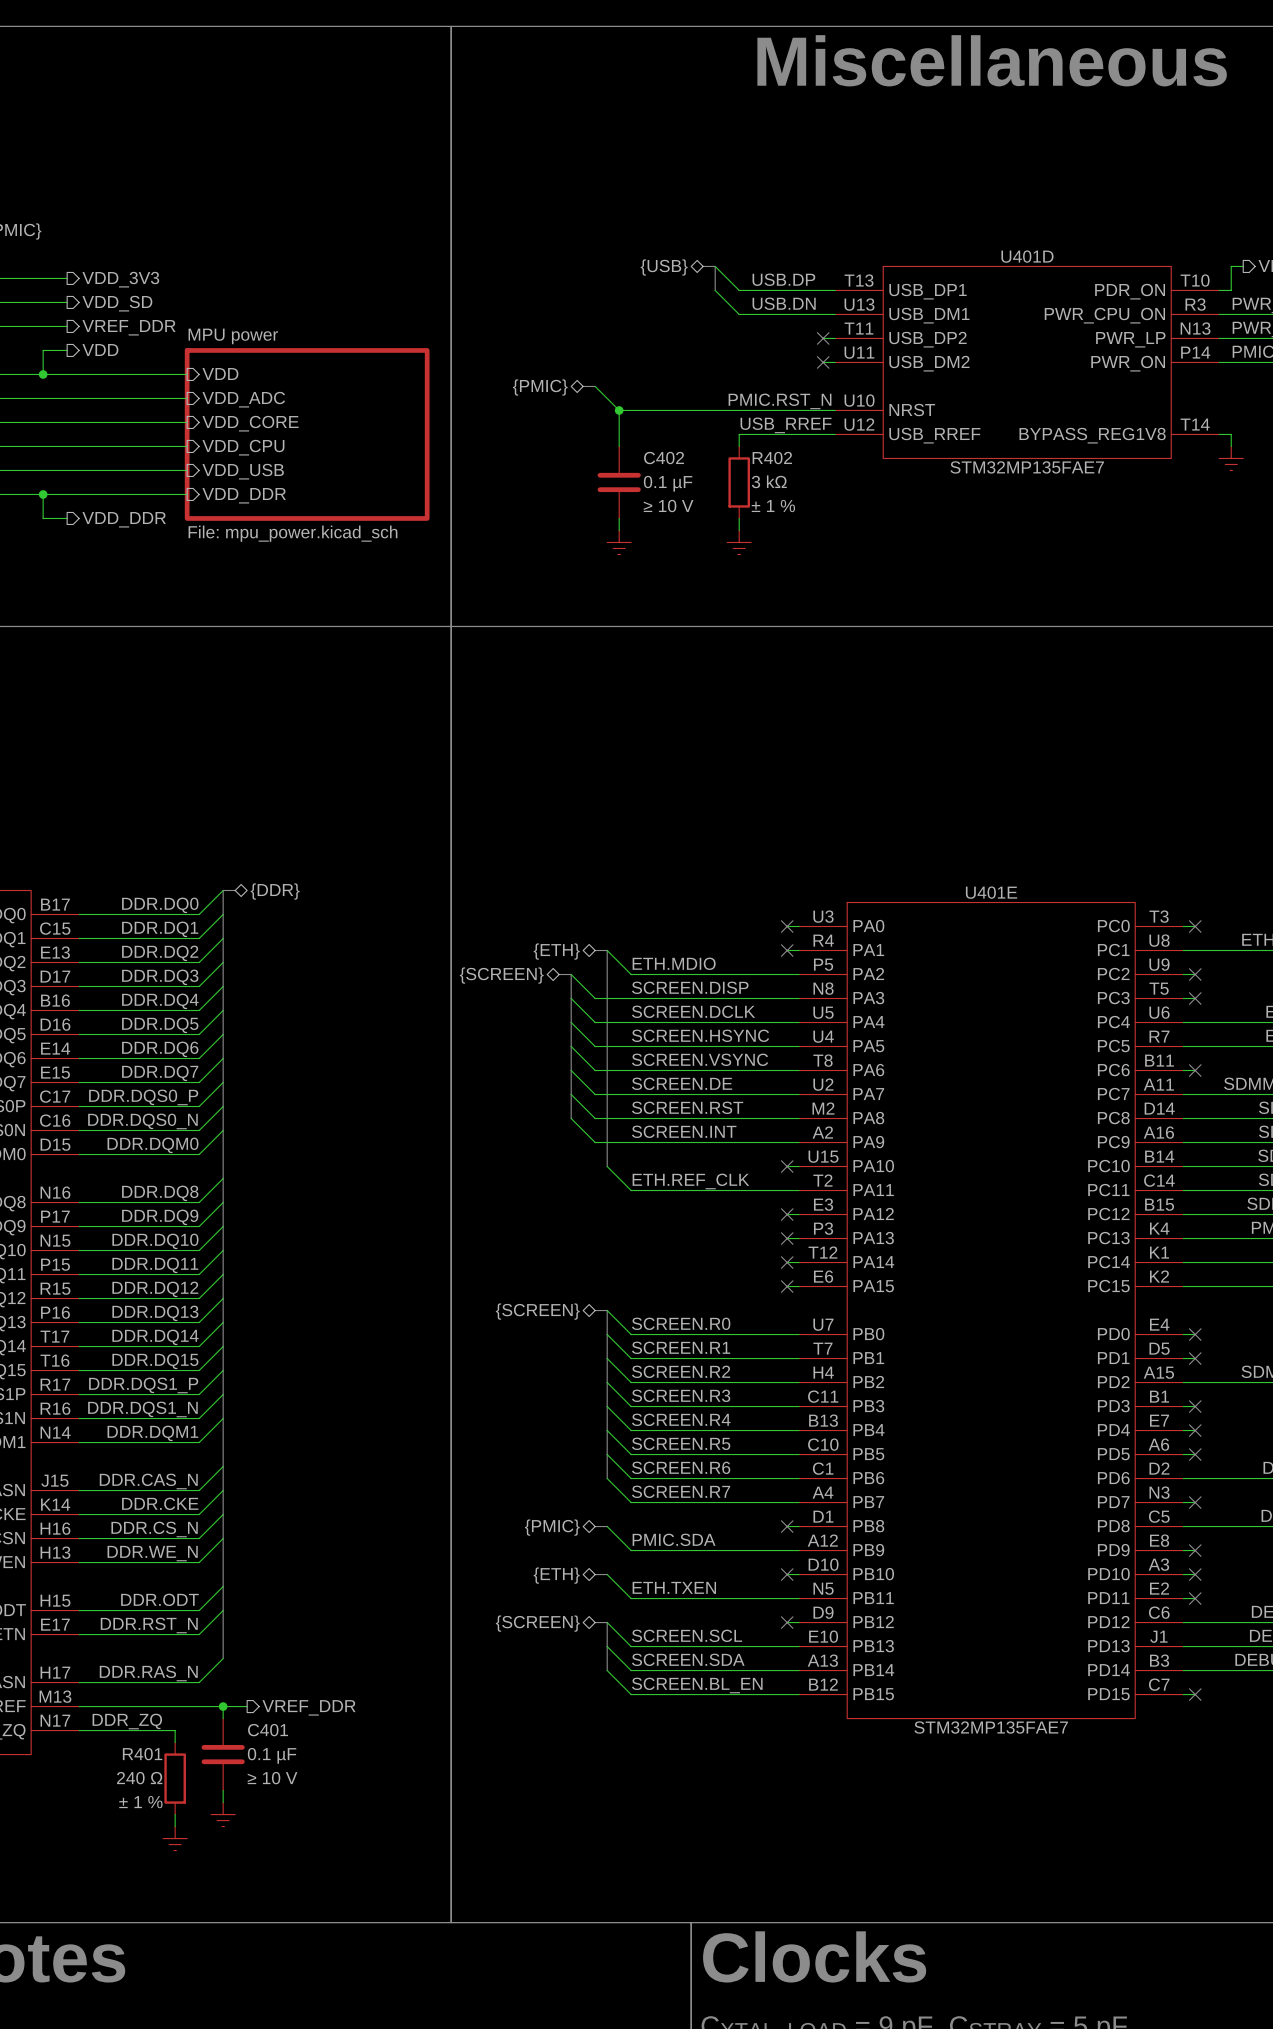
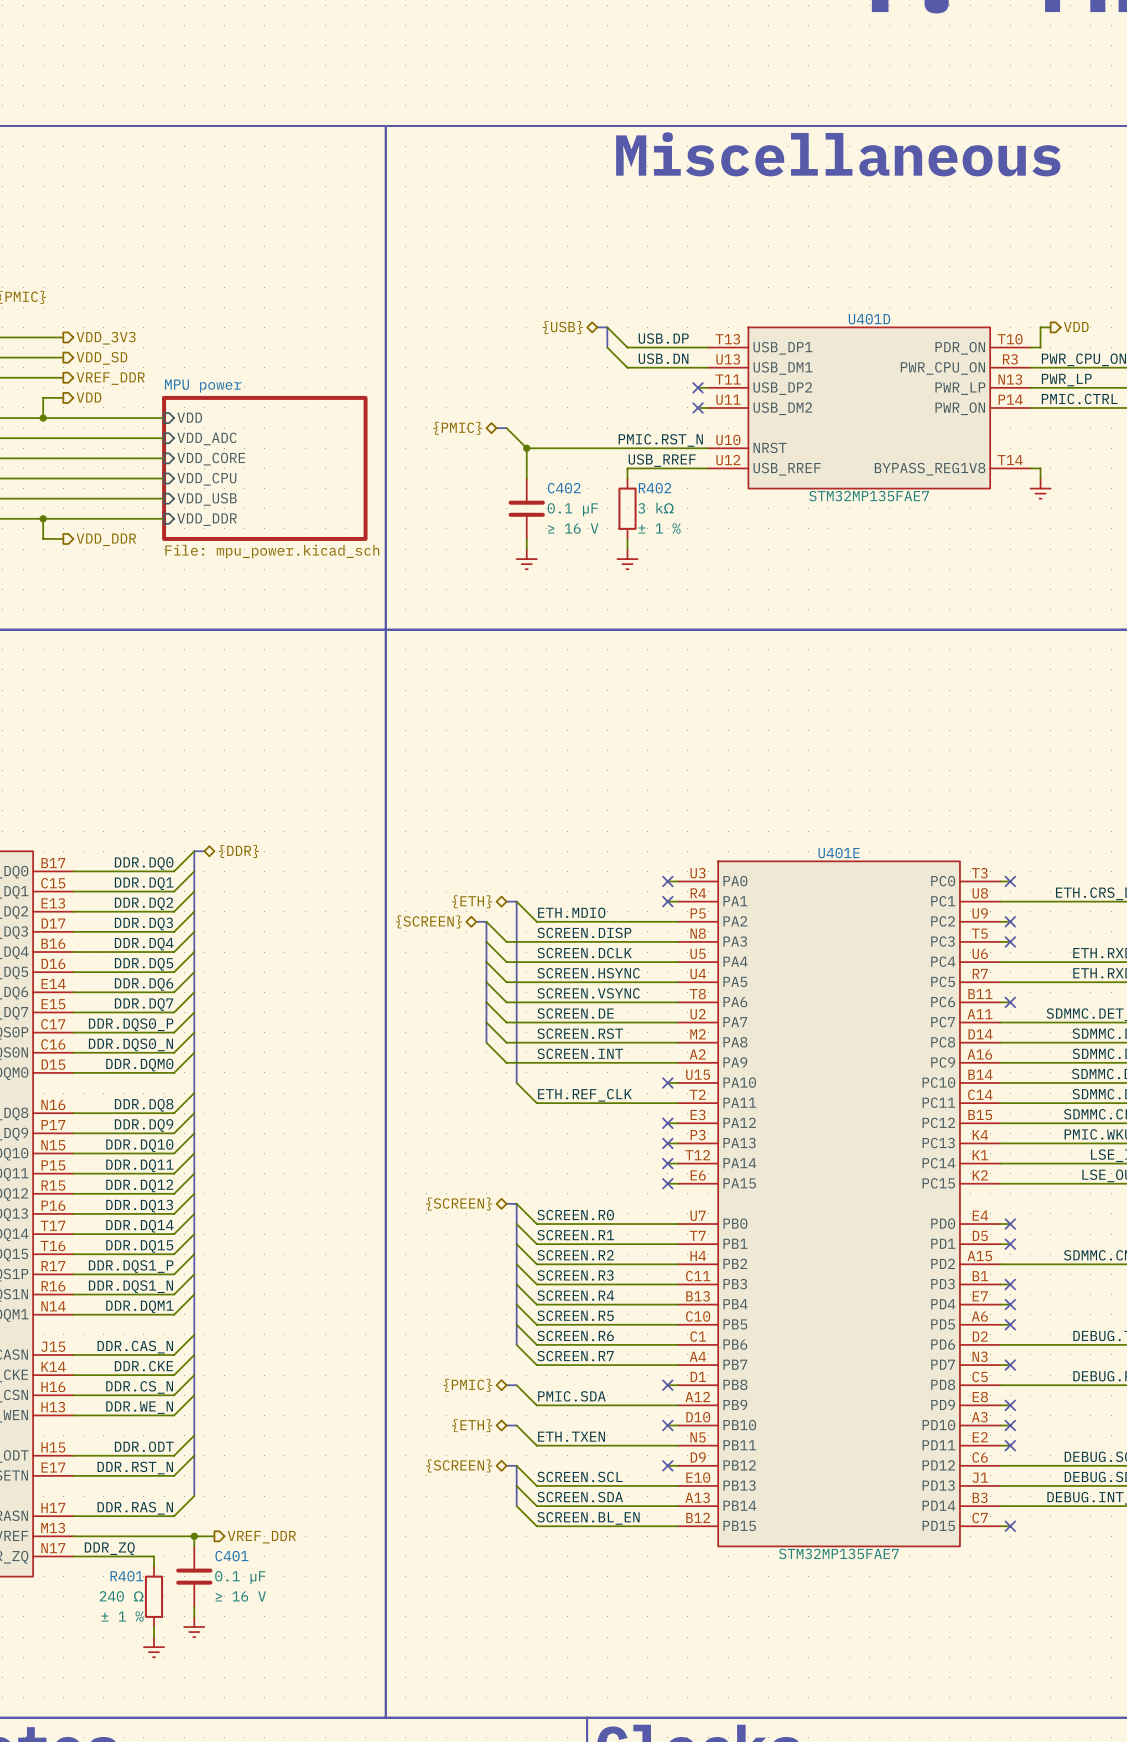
C402 text: ≥ 10 V (668, 506) -> ≥ 16 V (573, 528)
C401 text: ≥ 10 V (272, 1778) -> ≥ 16 V (240, 1596)

